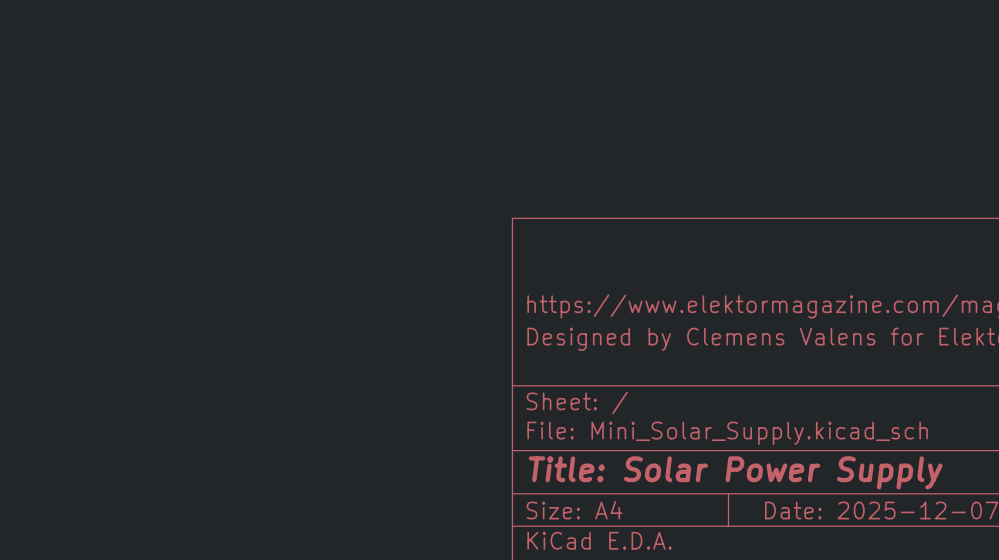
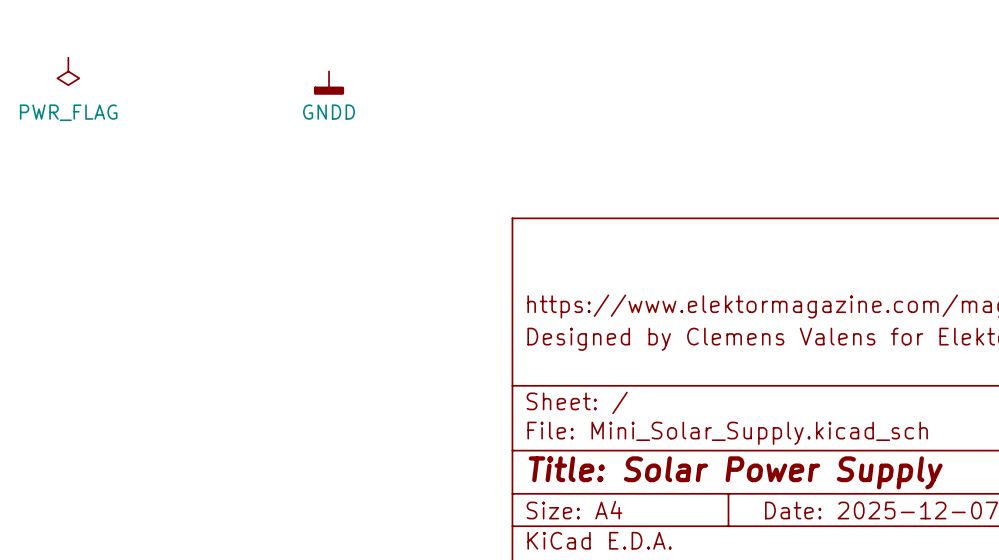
power symbol: none -> PWR_FLAG (68, 71)
power symbol: none -> GNDD (329, 83)

